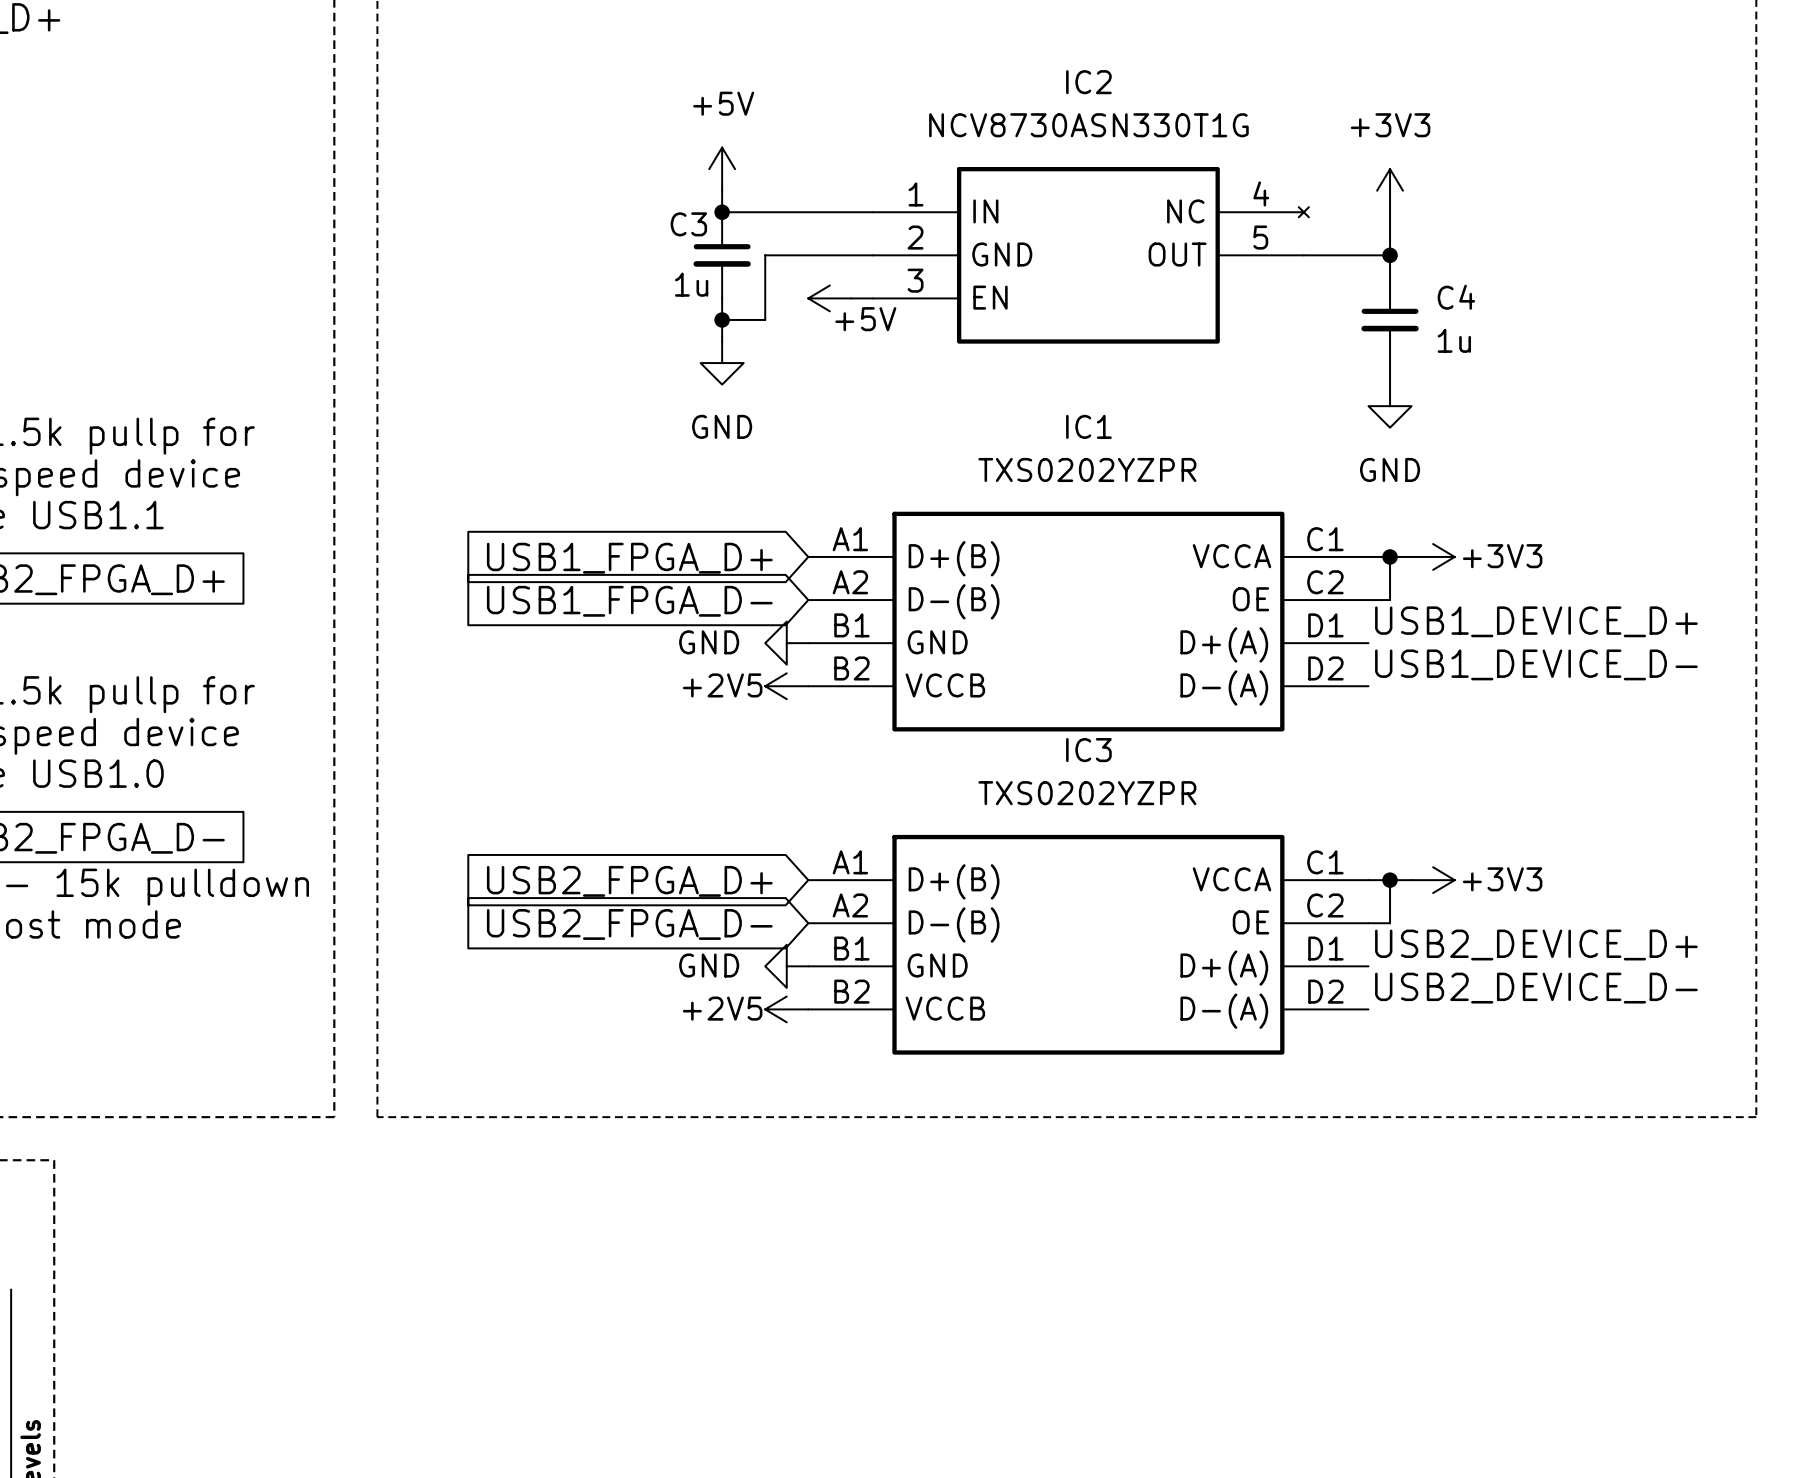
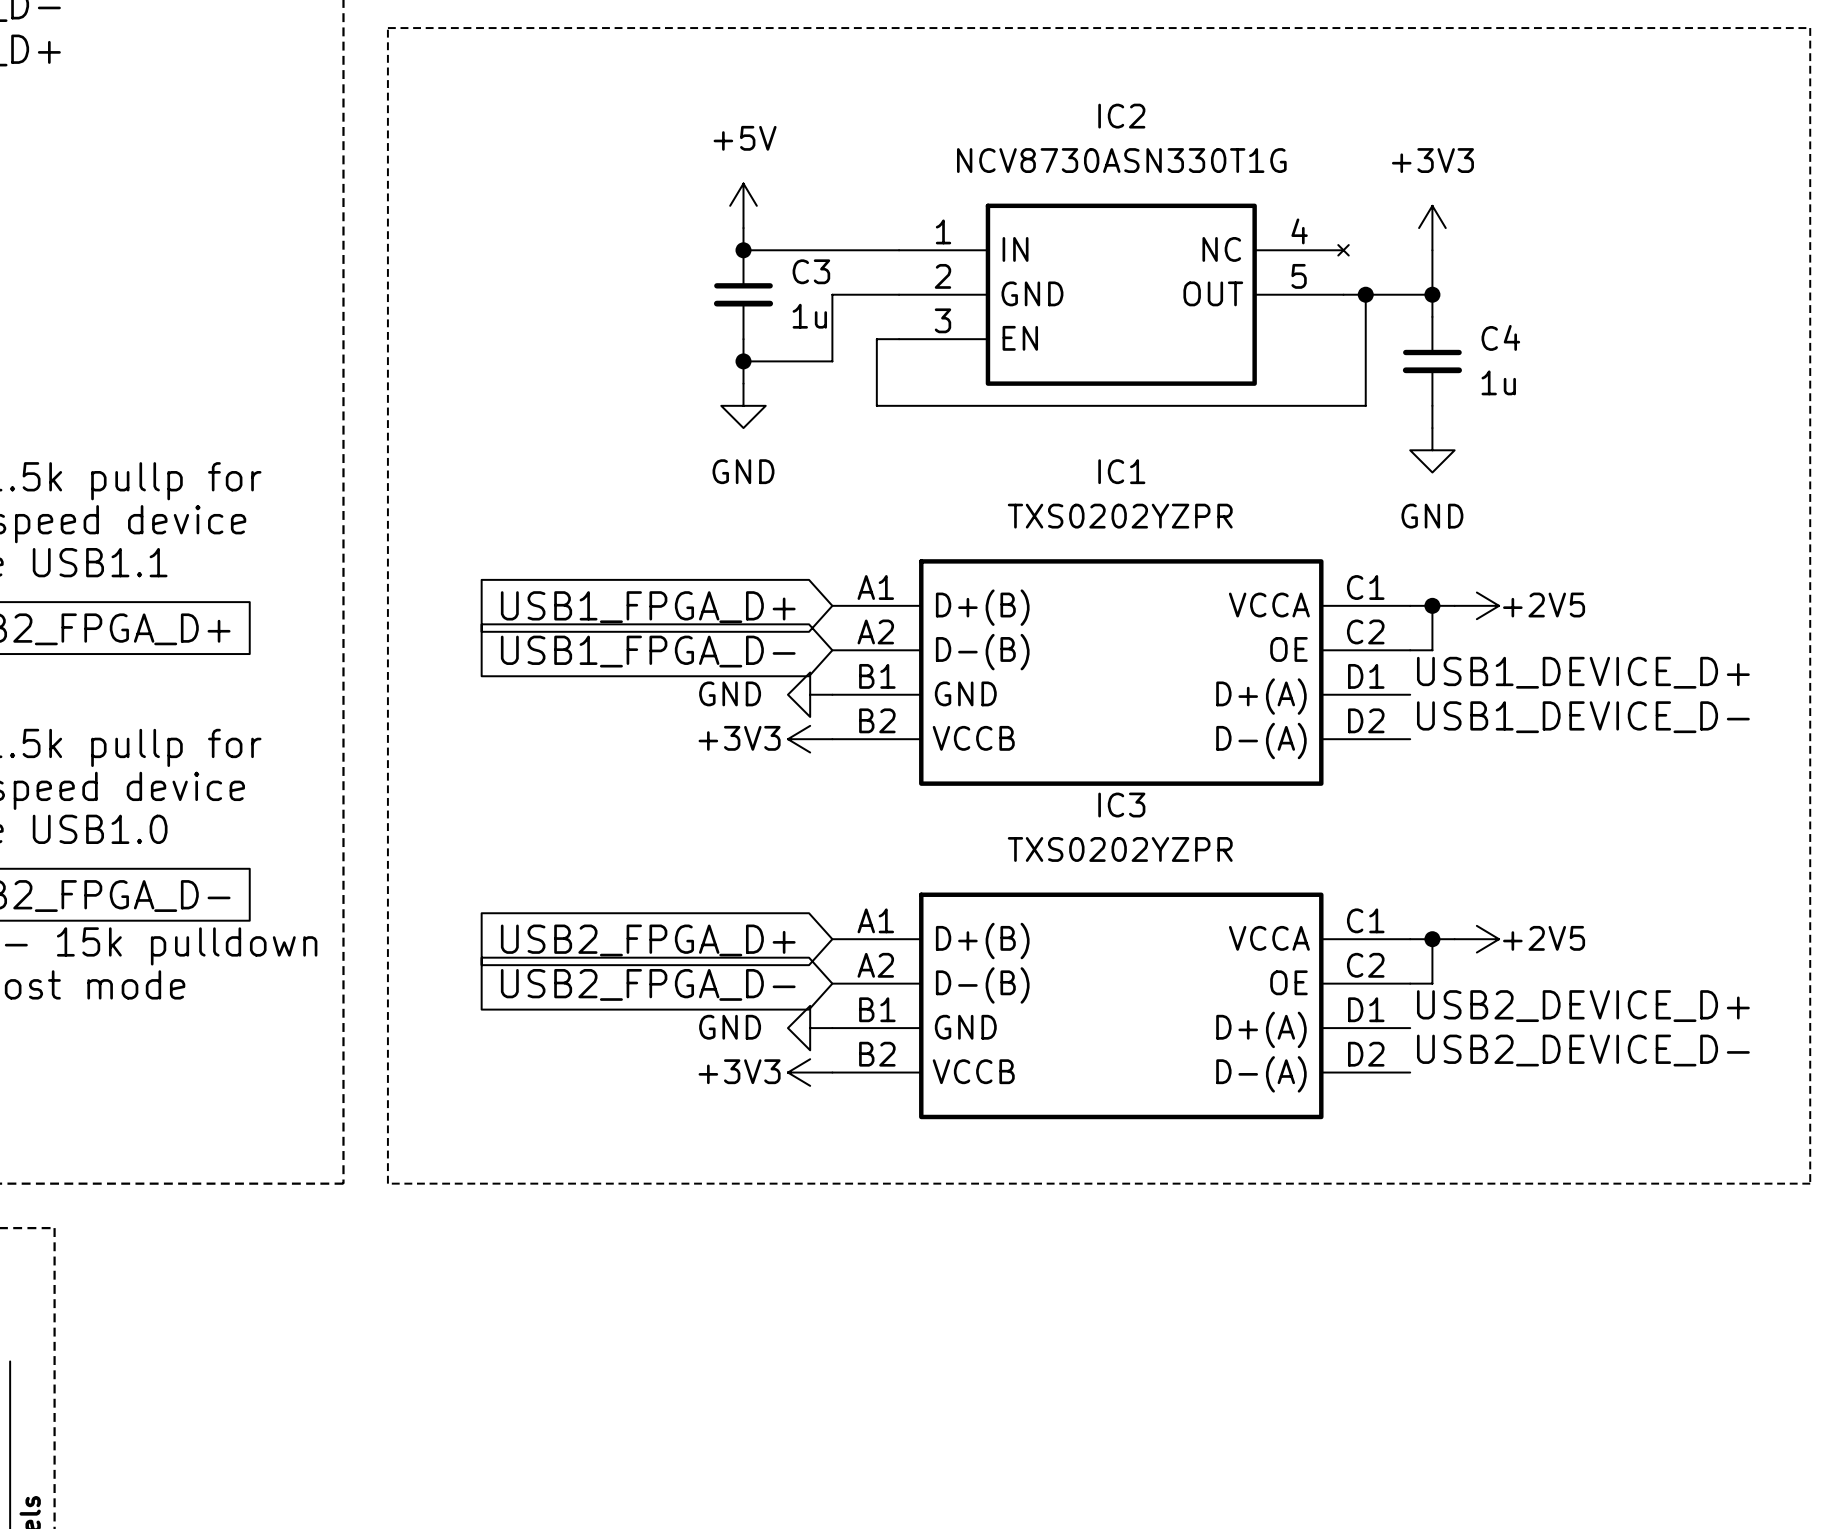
C3 name position: C3 (688, 224) -> C3 (811, 271)
wire: (808, 255) (765, 255) (765, 319) -> (832, 294) (832, 361) (787, 361)
wire: none -> (1365, 294) (1365, 405) (876, 405) (876, 339)
junction: none -> (1365, 294)
C3 value position: 1u (691, 284) -> 1u (809, 316)
power symbol: +5V (829, 298) -> none
power symbol: +3V3 (1433, 556) -> +2V5 (1476, 605)
power symbol: +2V5 (786, 686) -> +3V3 (810, 739)
power symbol: +3V3 (1433, 880) -> +2V5 (1476, 939)
power symbol: +2V5 (786, 1009) -> +3V3 (810, 1072)

